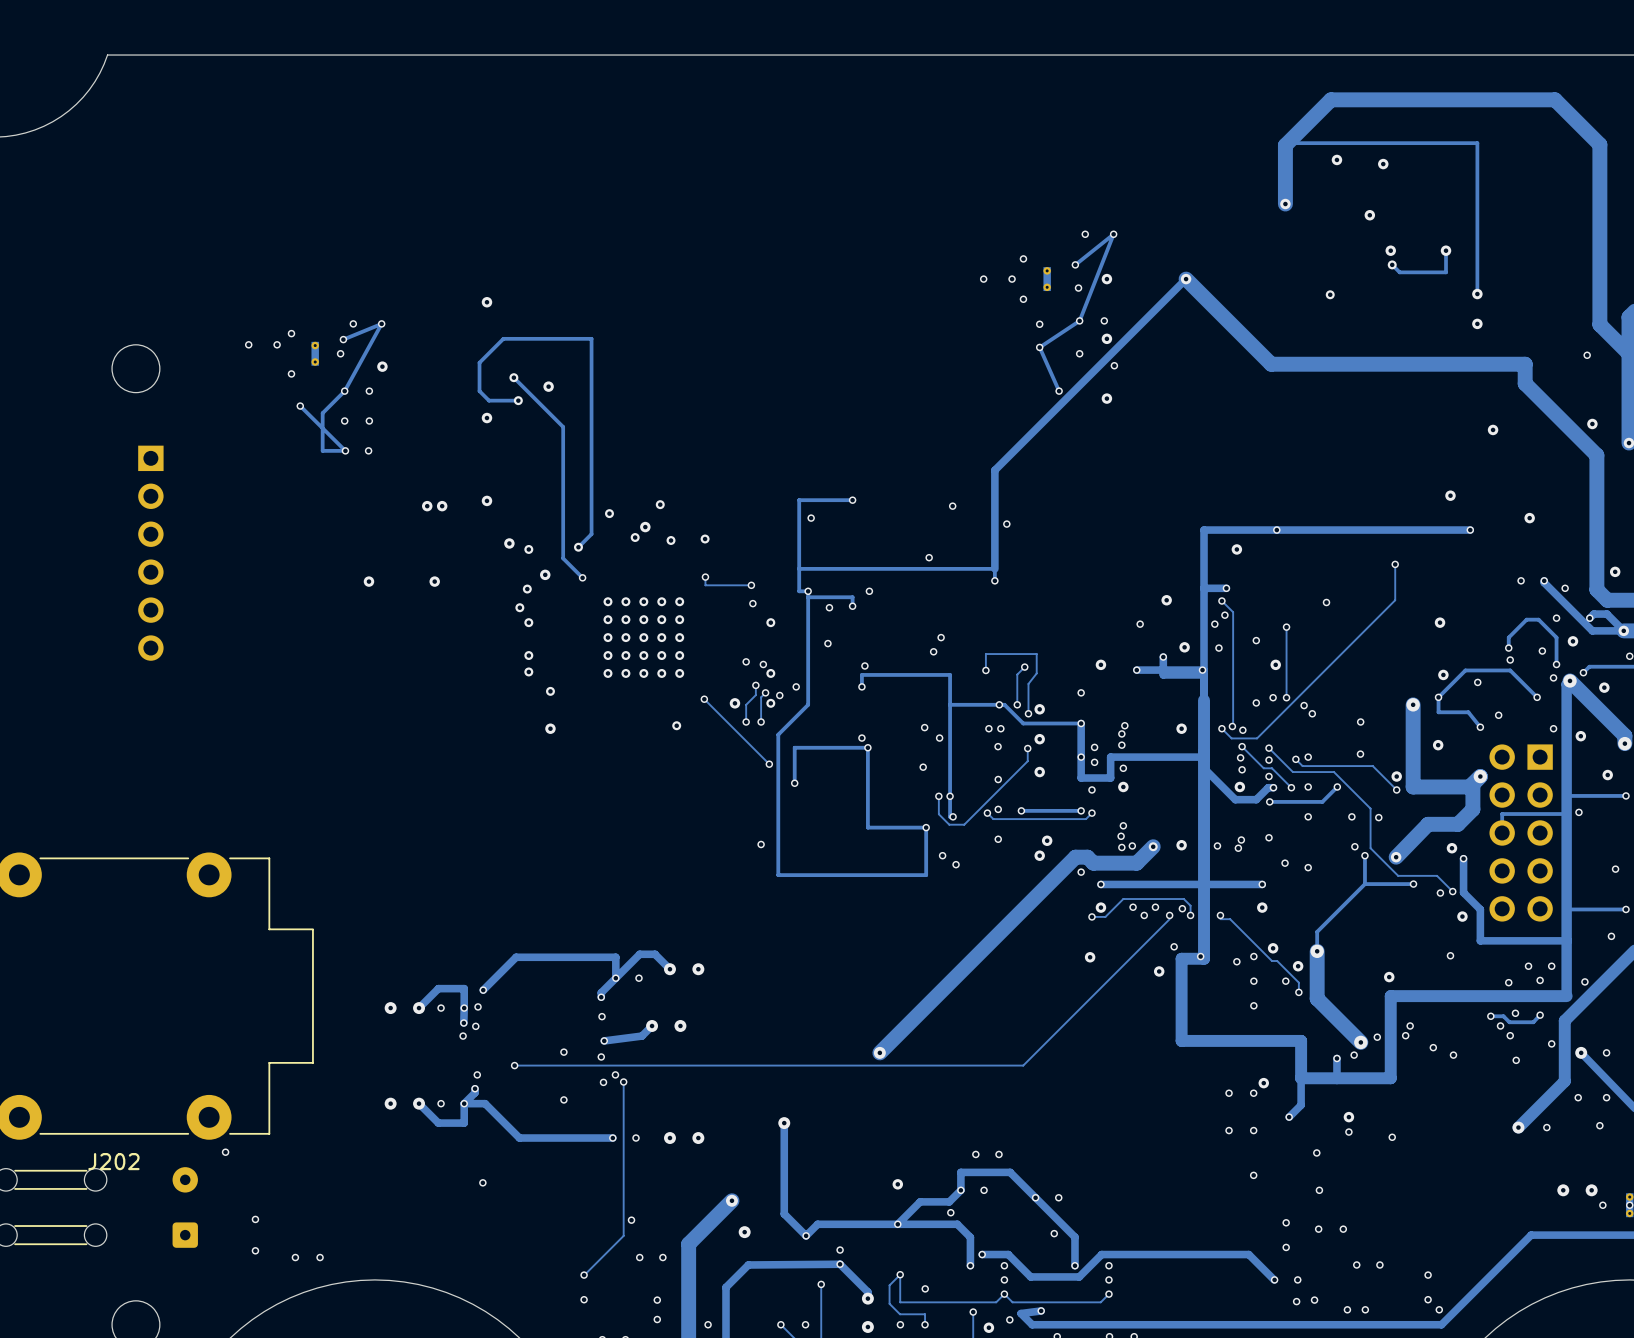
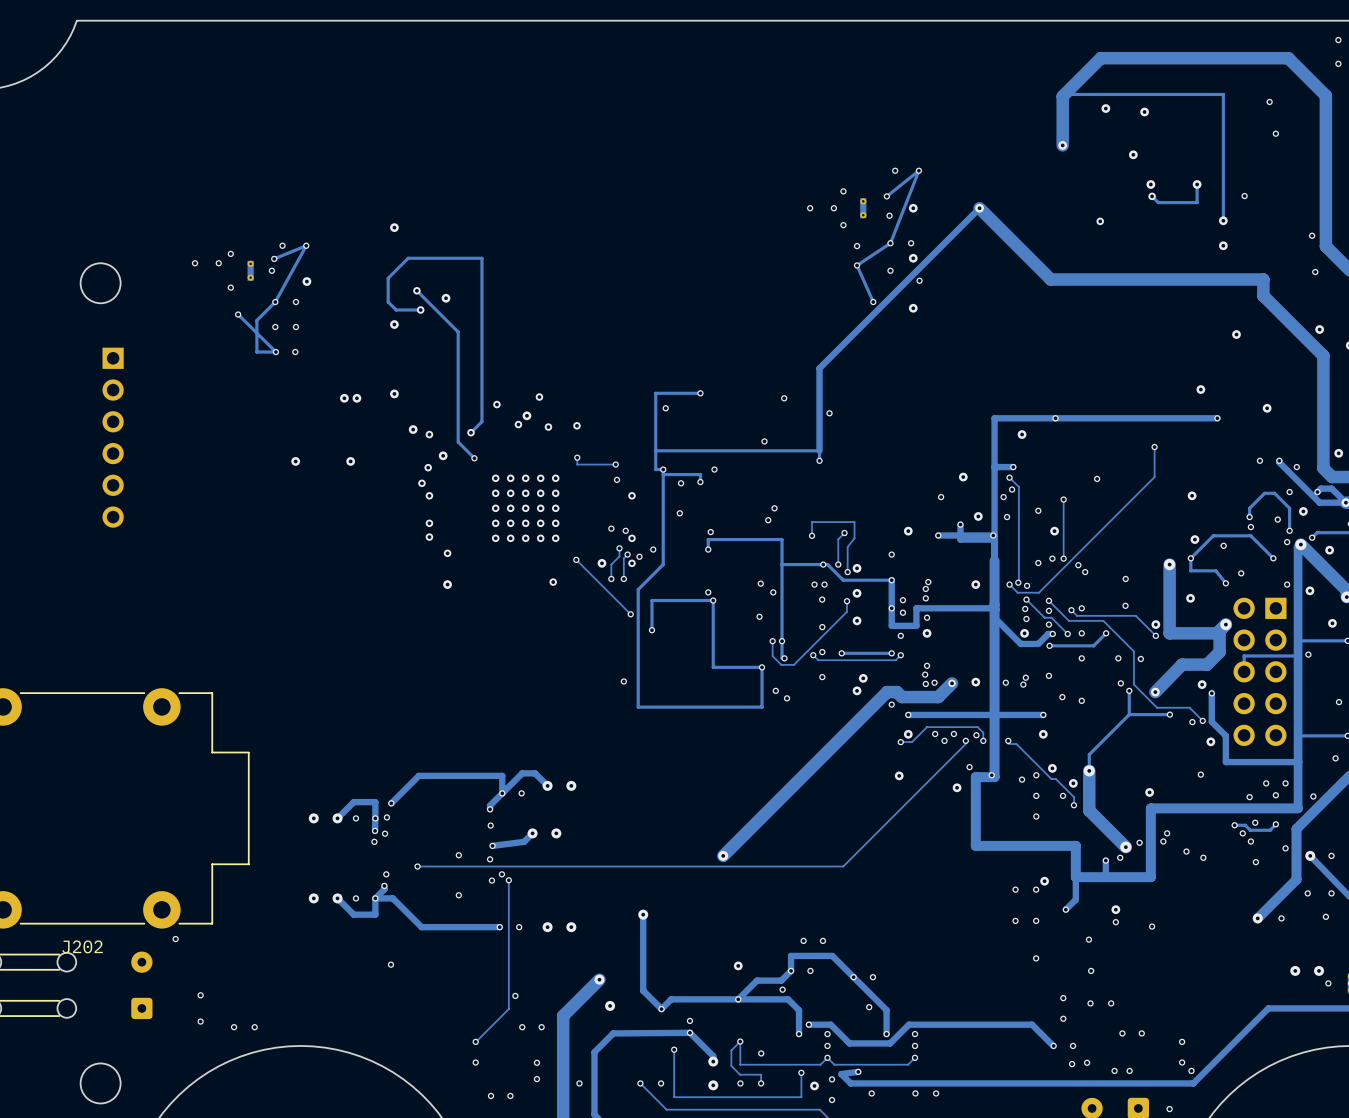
via: none -> (1338, 40)
via: none -> (1338, 63)
via: none -> (1269, 101)
via: none -> (1275, 133)
via: none -> (1244, 196)
via: none -> (1312, 235)

